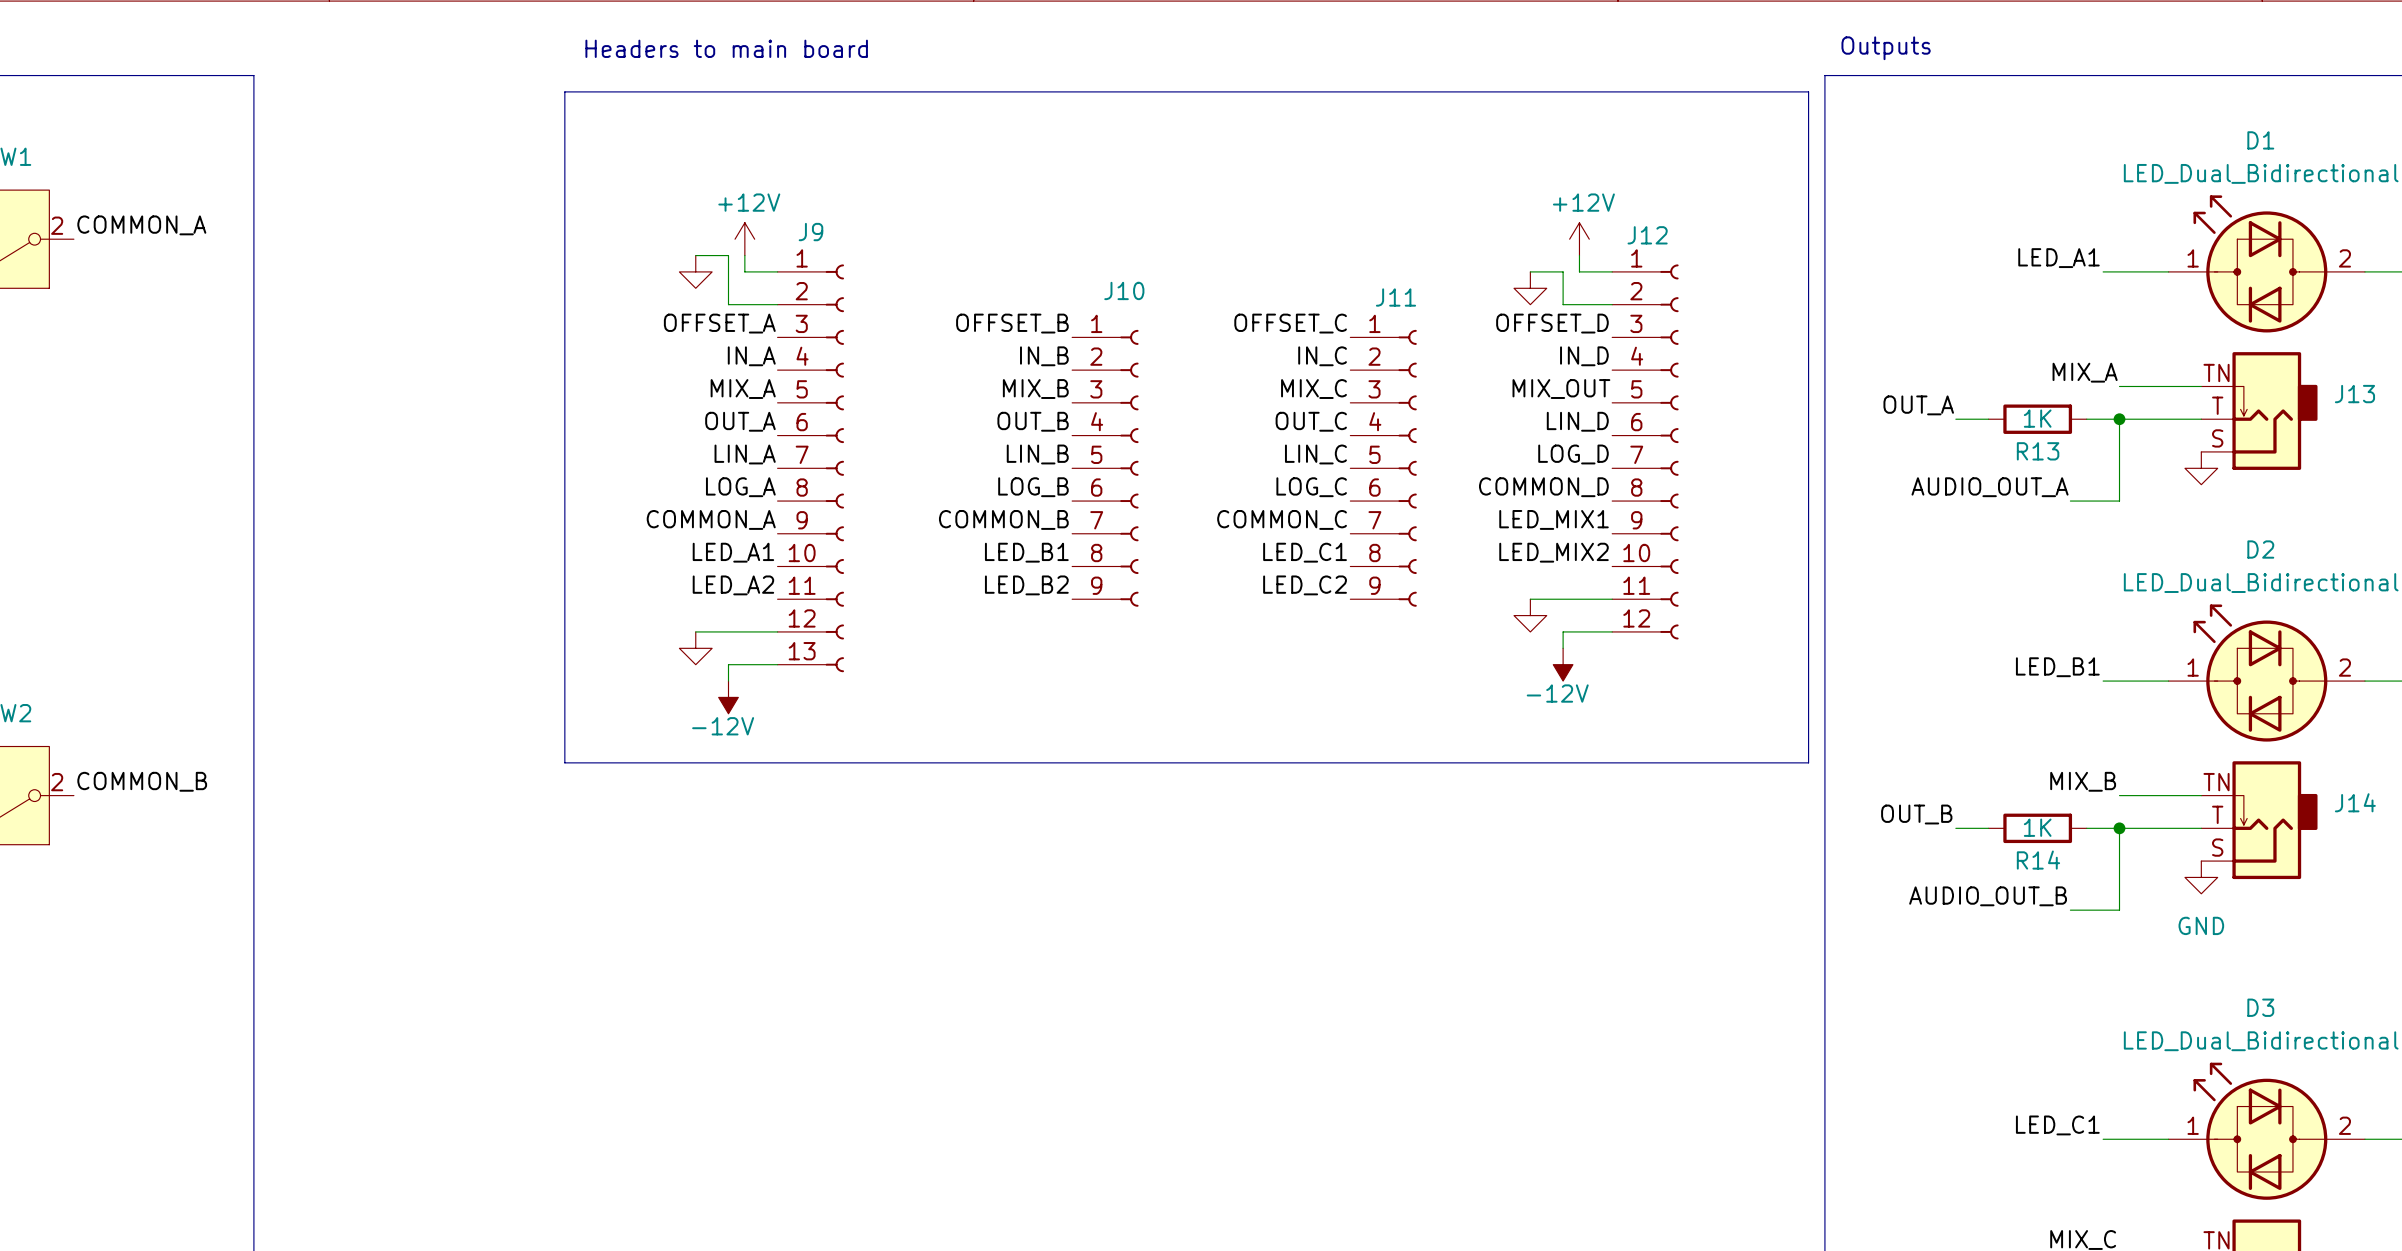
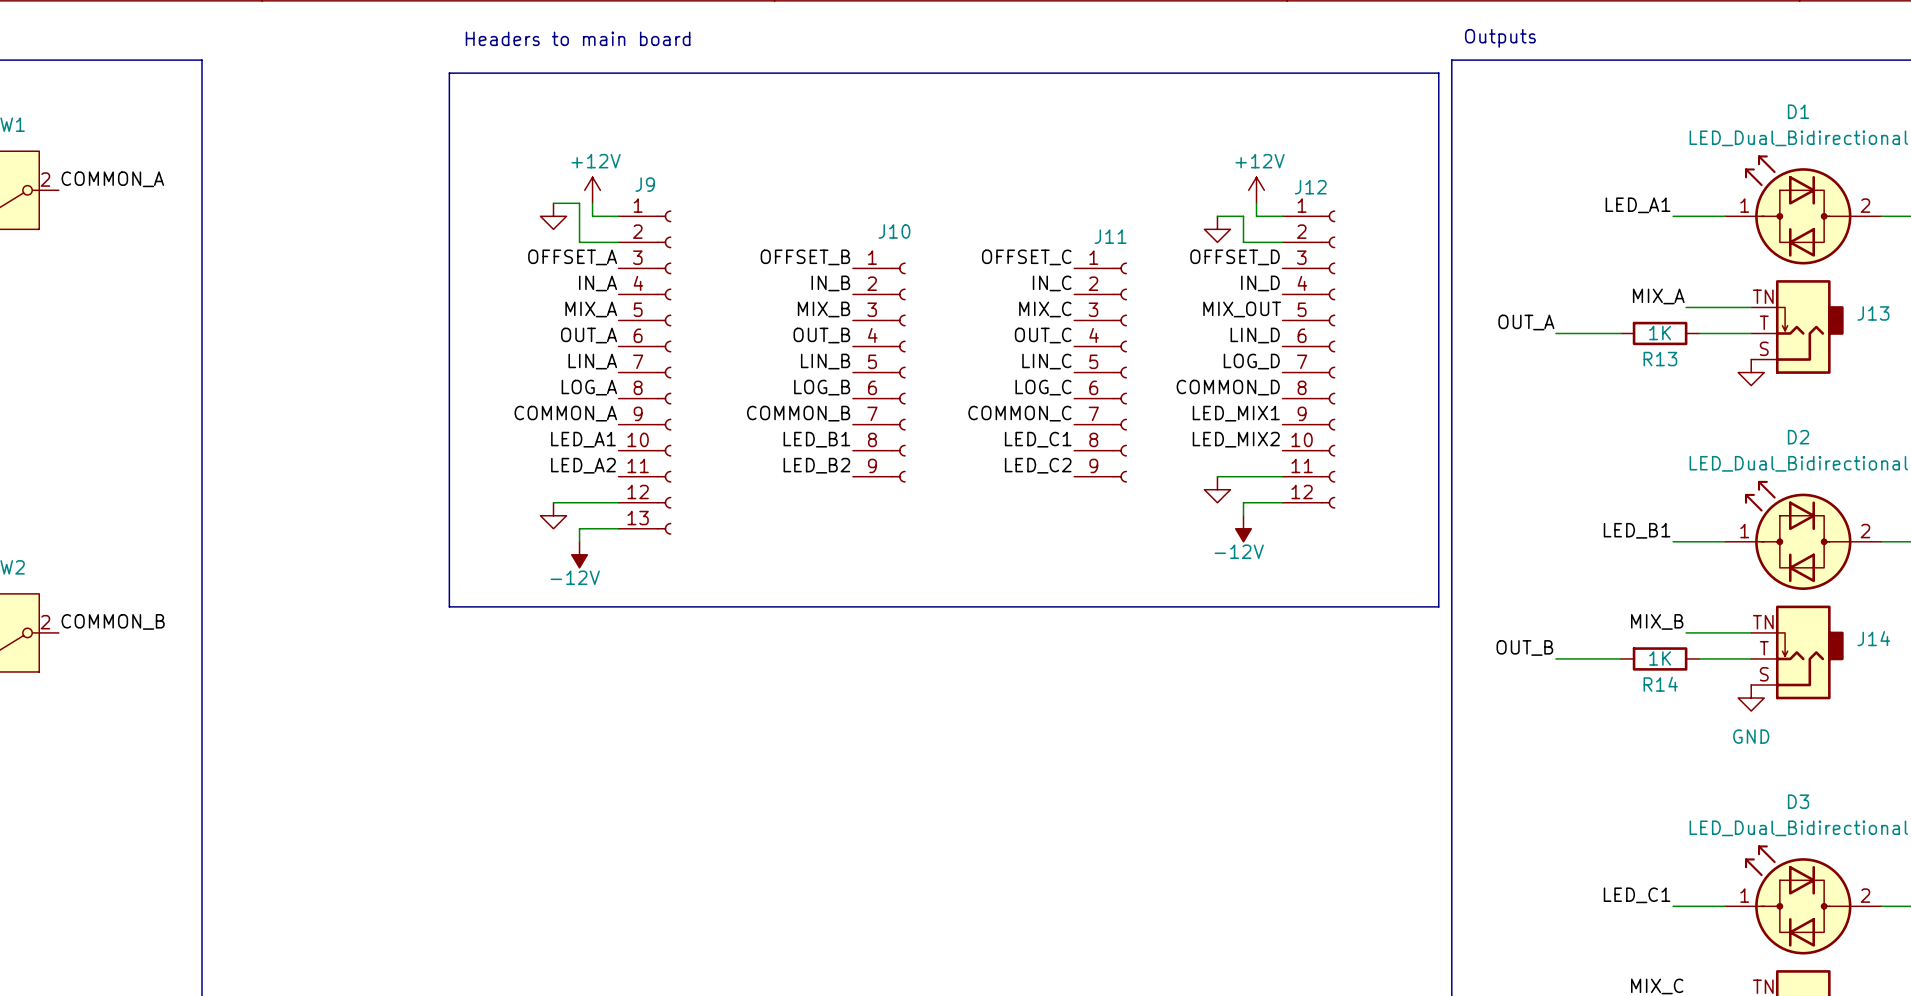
R13 position: (2037, 419) -> (1660, 333)
wire: (2086, 419) (2135, 419) -> (1581, 333) (1621, 333)
wire: (2119, 419) (2119, 501) (2070, 501) -> none
junction: (2119, 419) -> none
label: AUDIO_OUT_A (1990, 487) -> none
R14 position: (2037, 828) -> (1660, 658)
wire: (2086, 828) (2135, 828) -> (1581, 658) (1621, 658)
wire: (2119, 828) (2119, 910) (2070, 910) -> none
junction: (2119, 828) -> none
label: AUDIO_OUT_B (1988, 896) -> none

